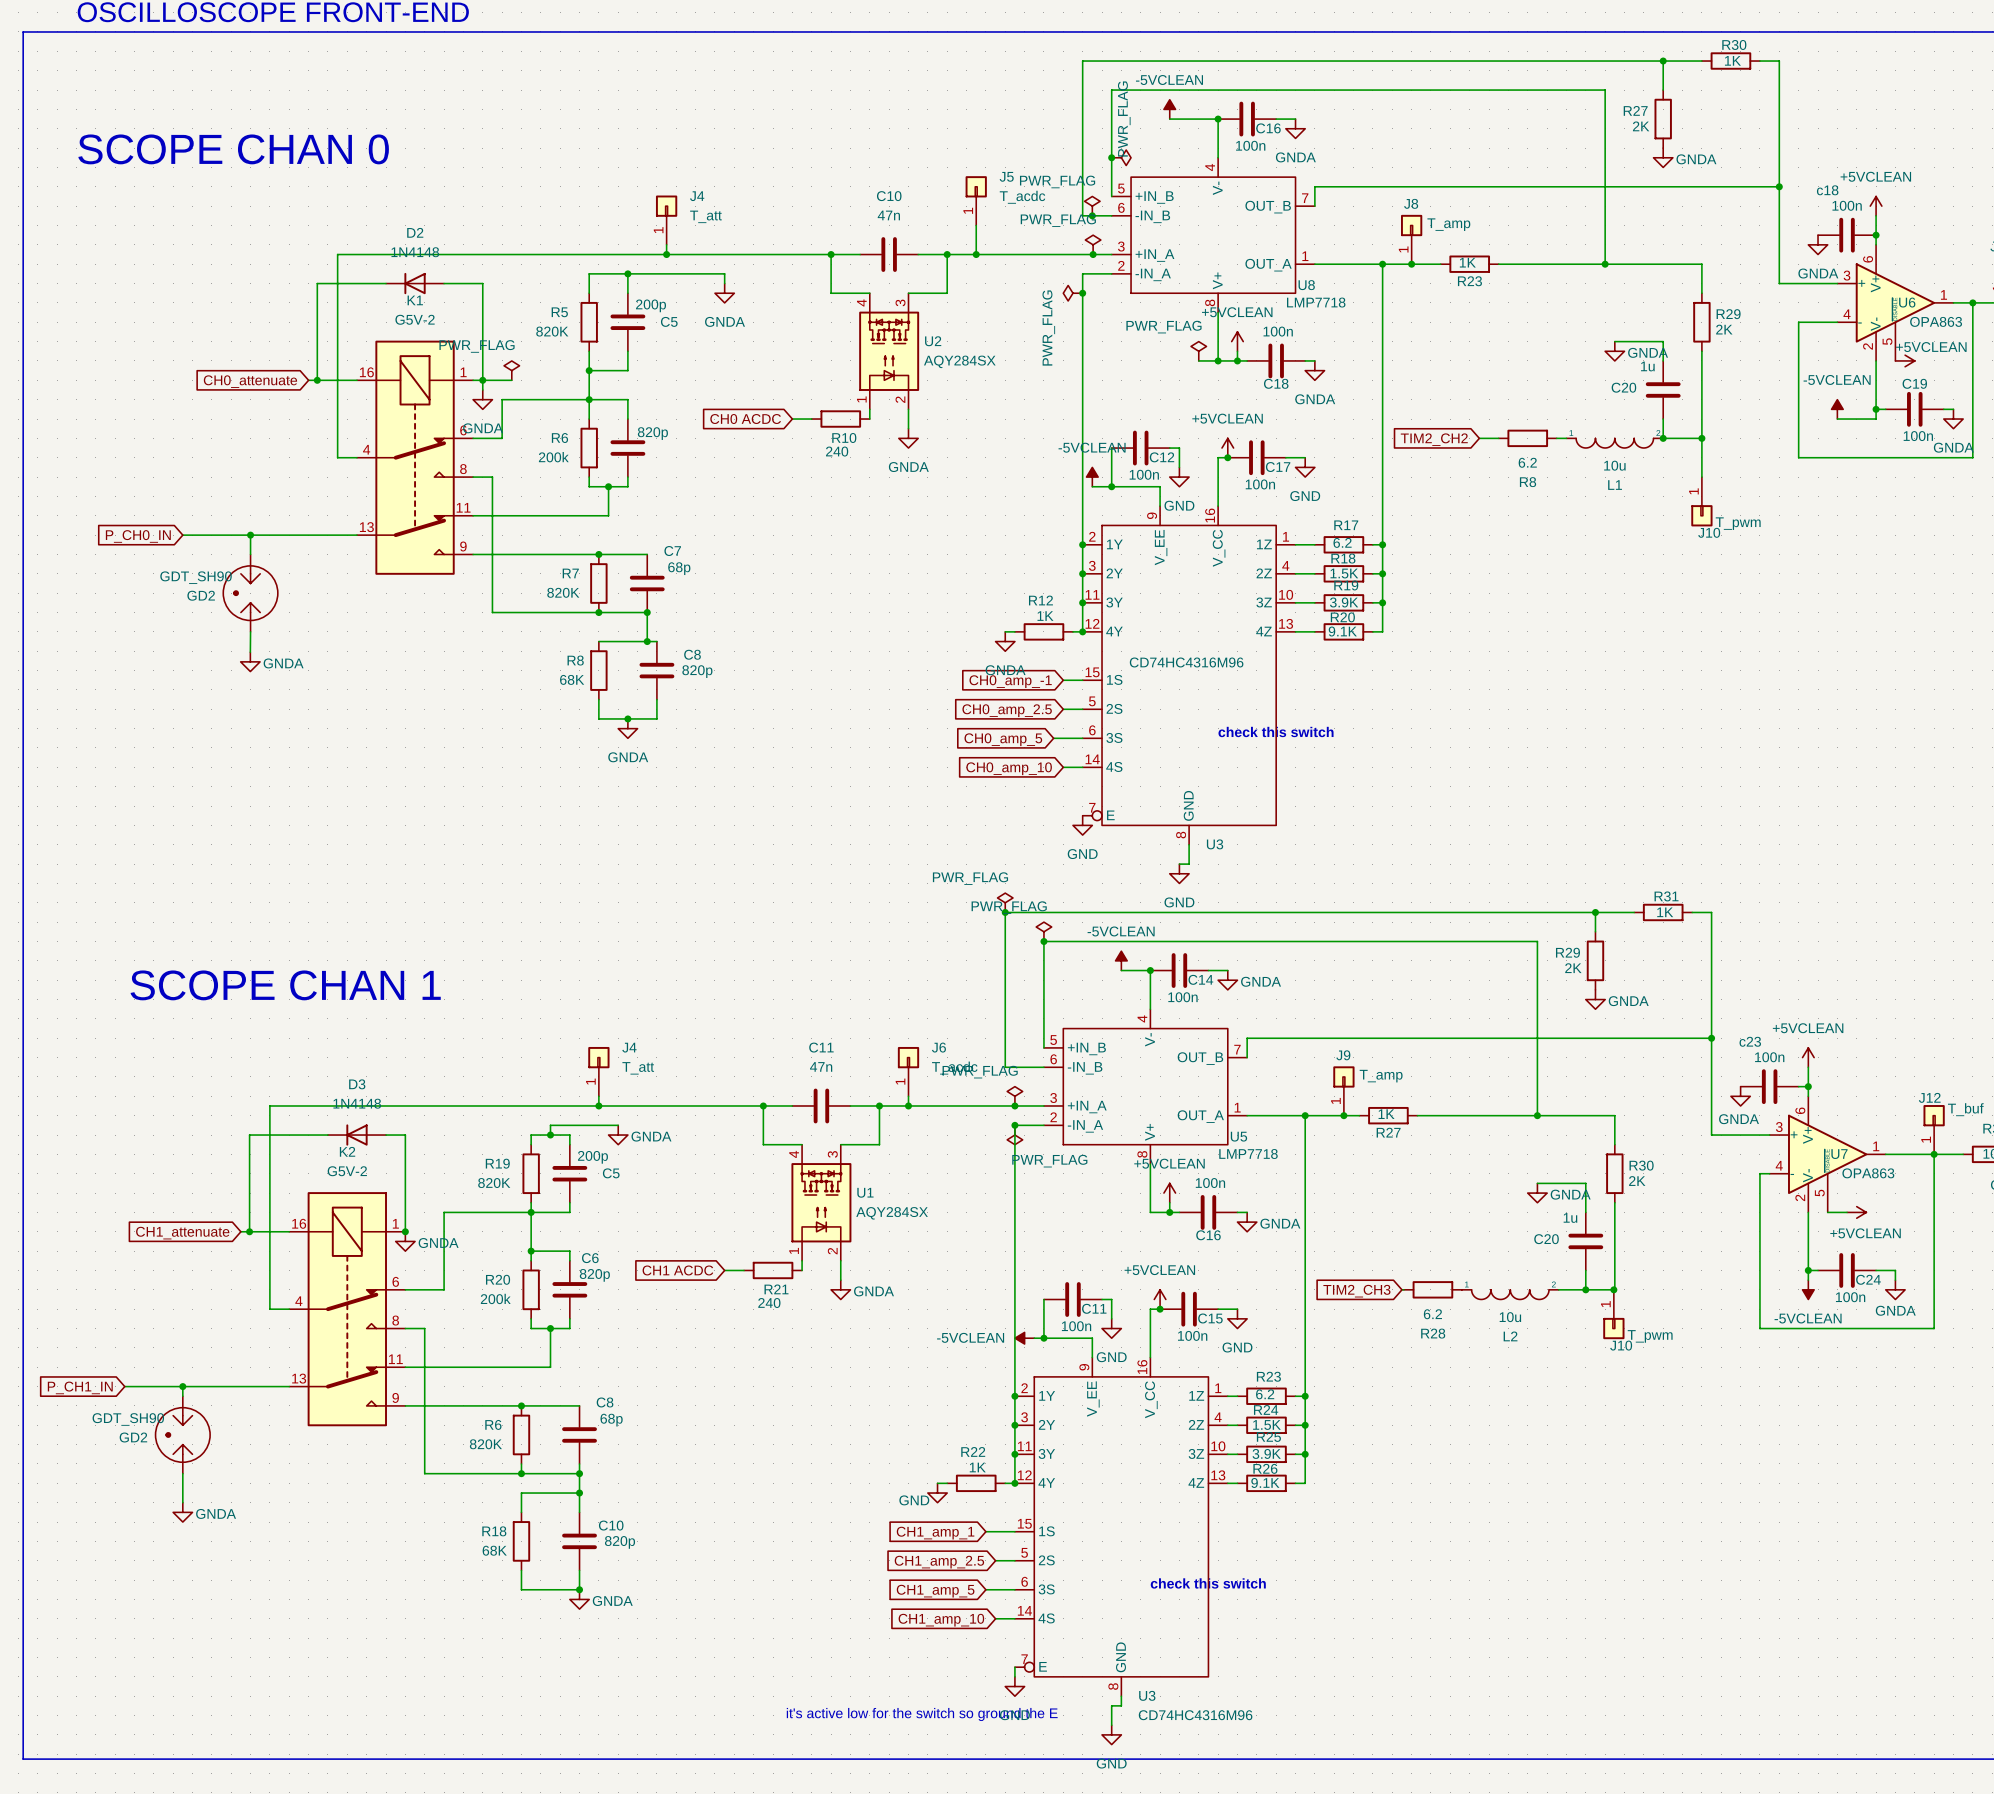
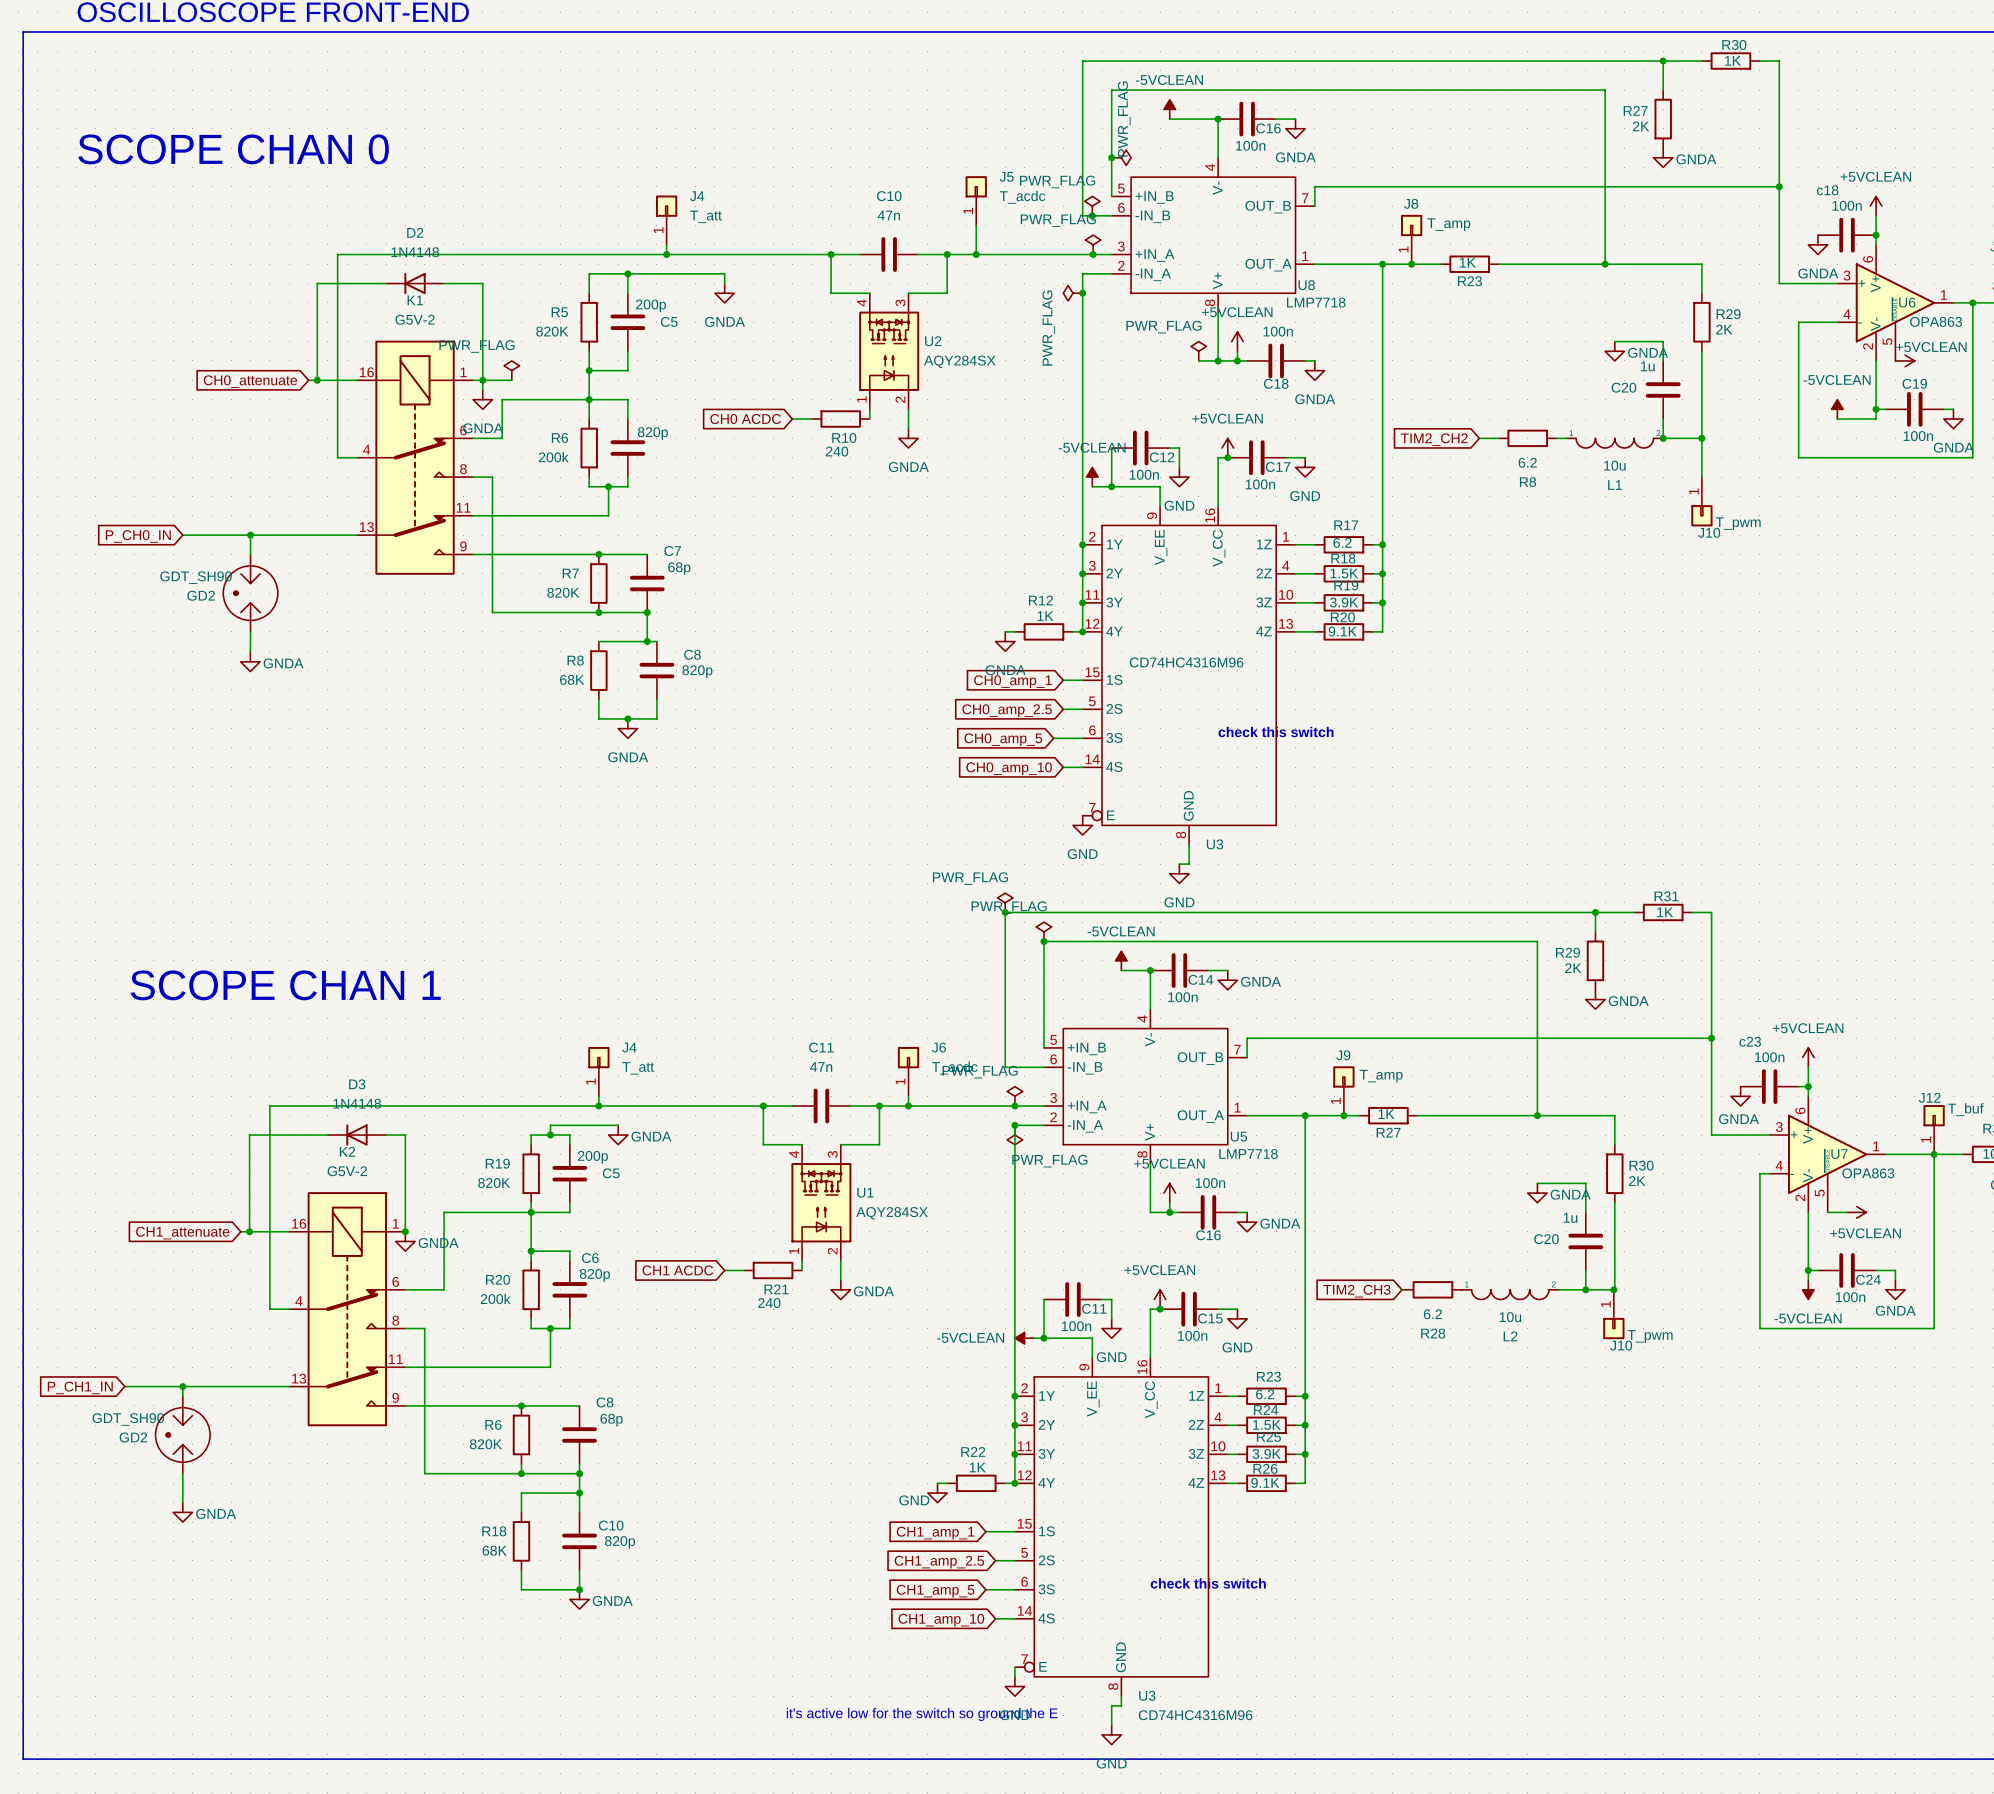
global label: CH0_amp_-1 (1010, 681) -> CH0_amp_1 (1012, 681)

